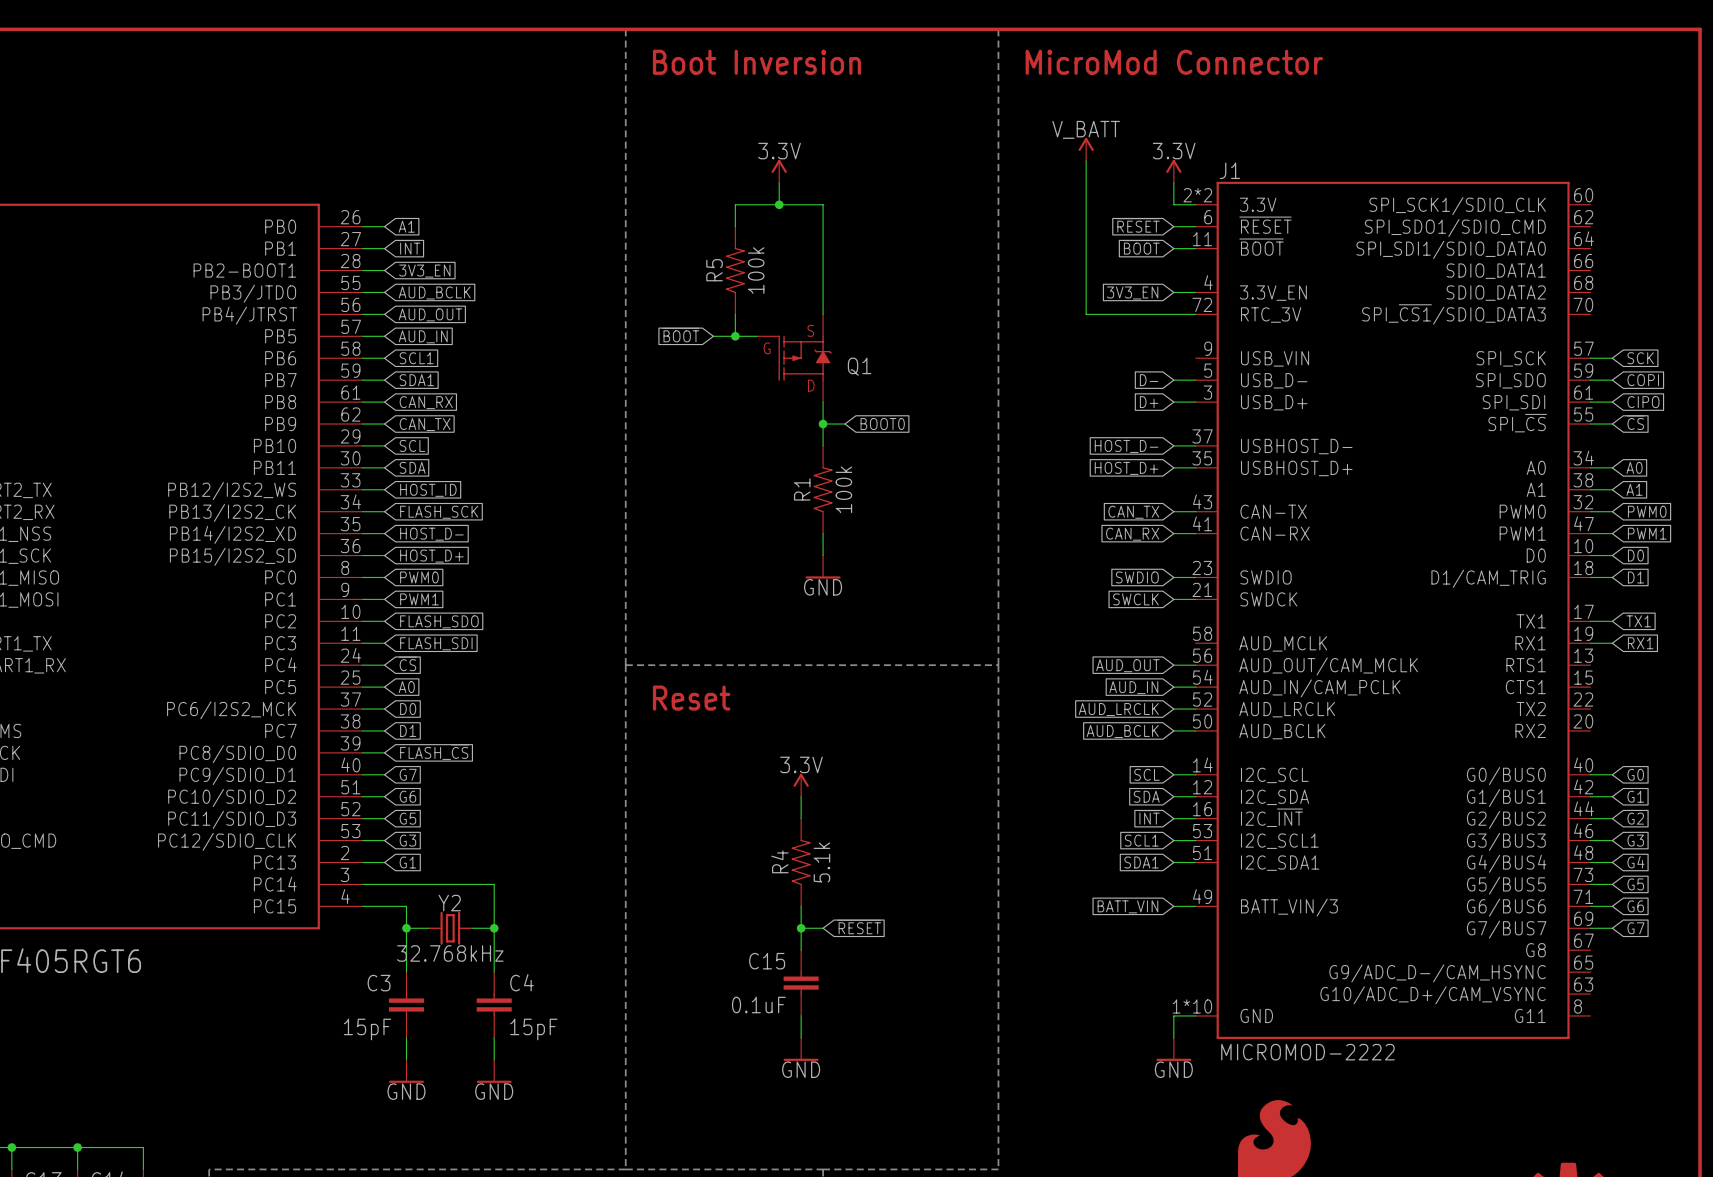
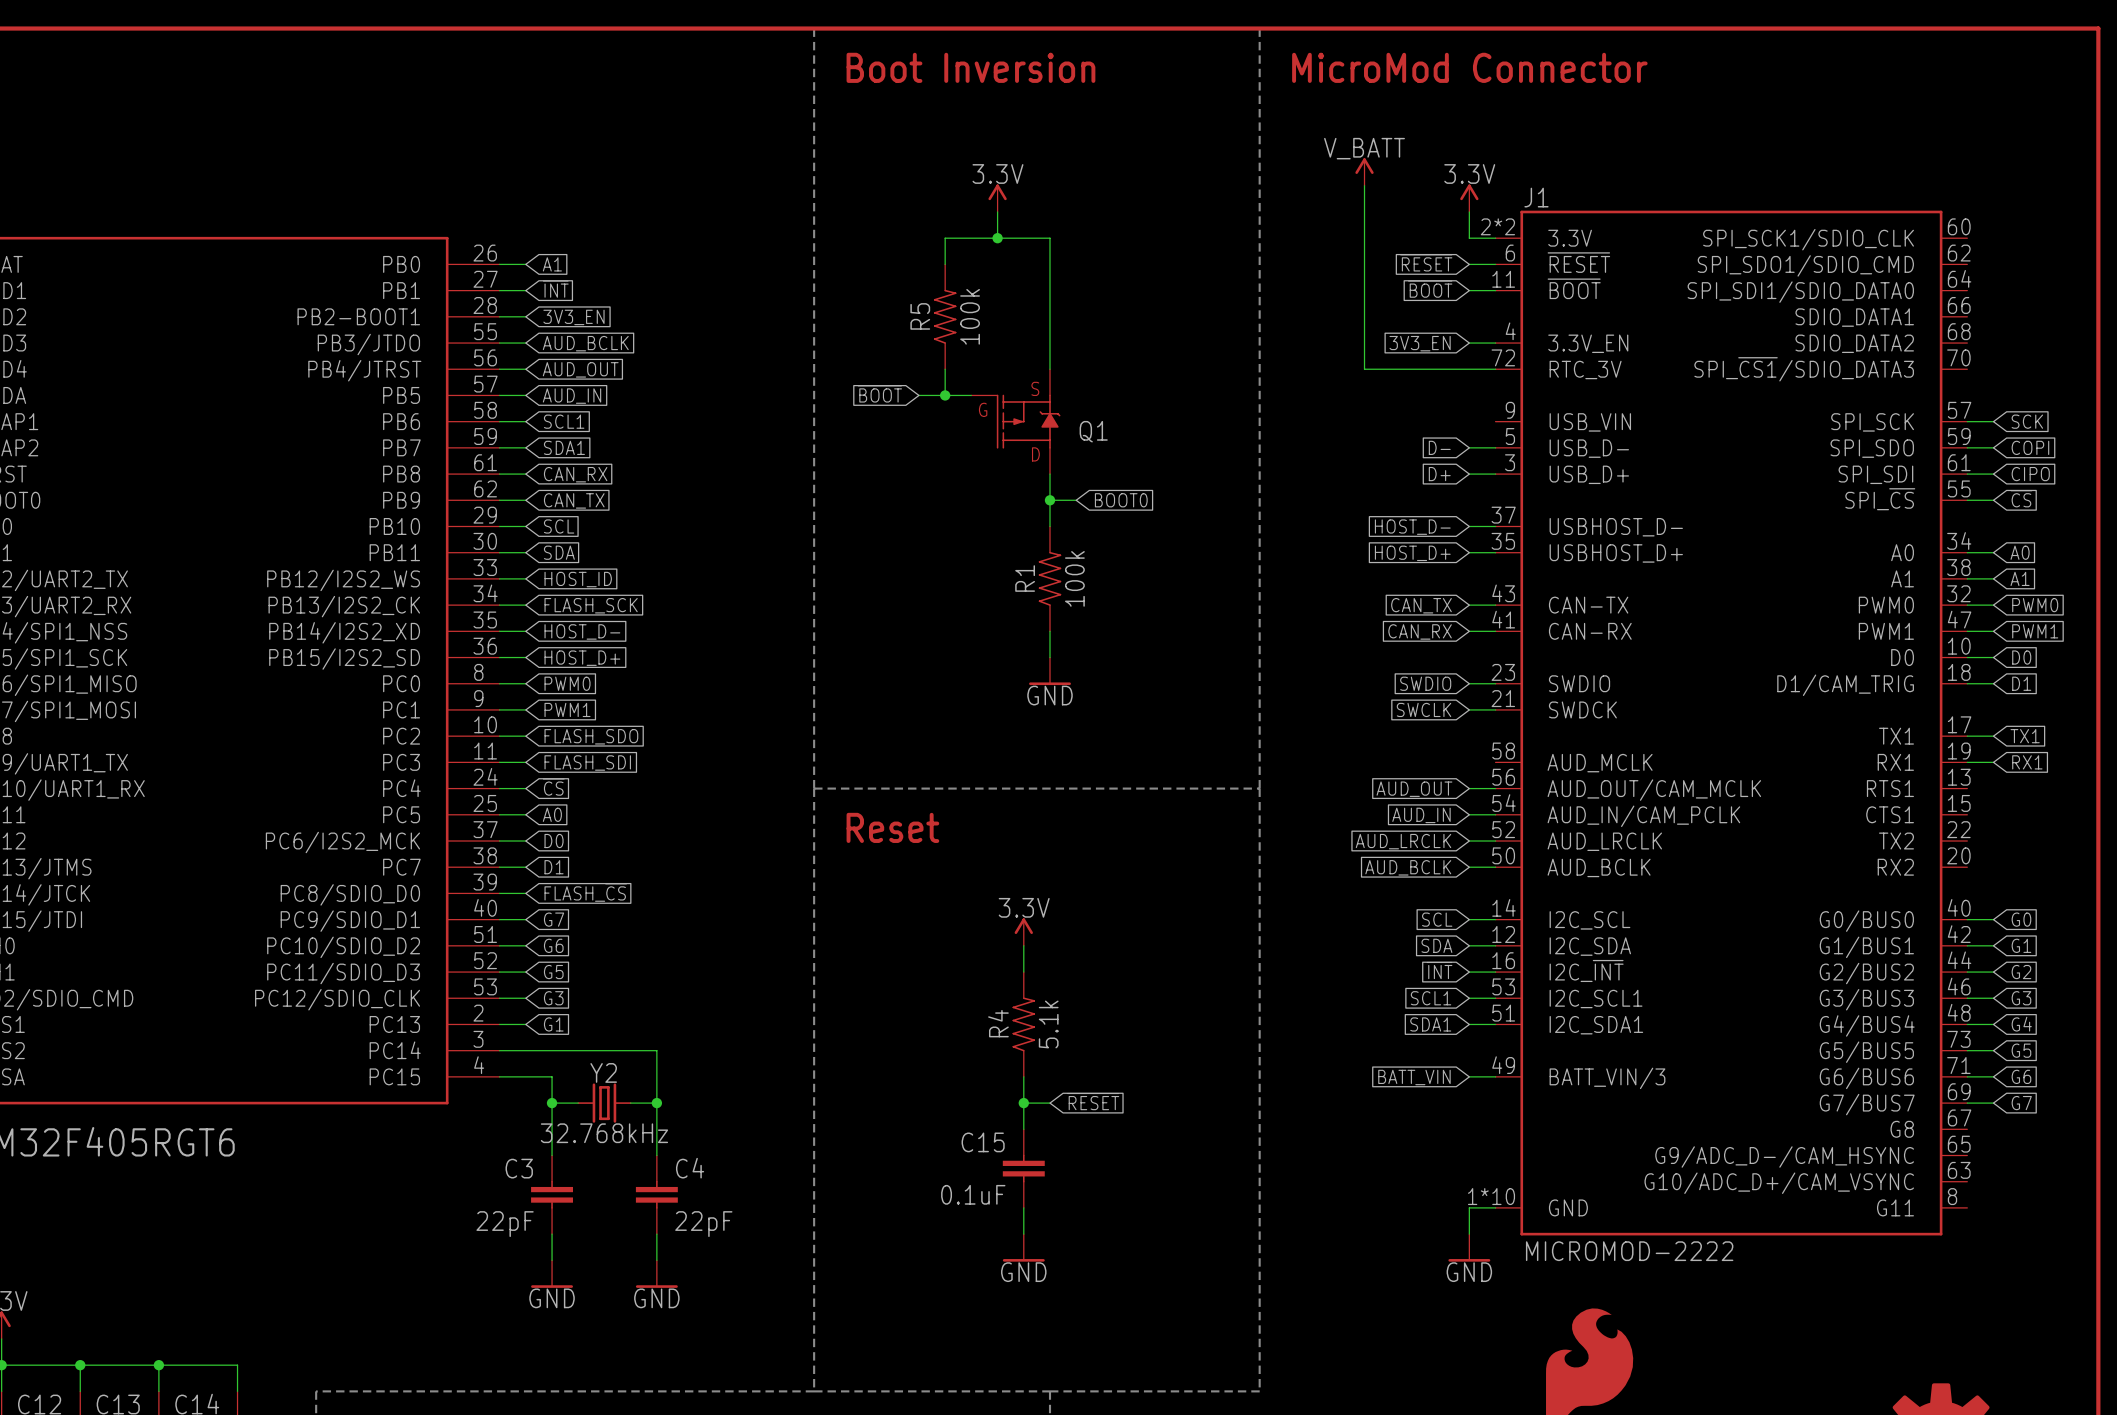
C3 value: 15pF (367, 1029) -> 22pF (505, 1224)
C4 value: 15pF (533, 1029) -> 22pF (703, 1224)

